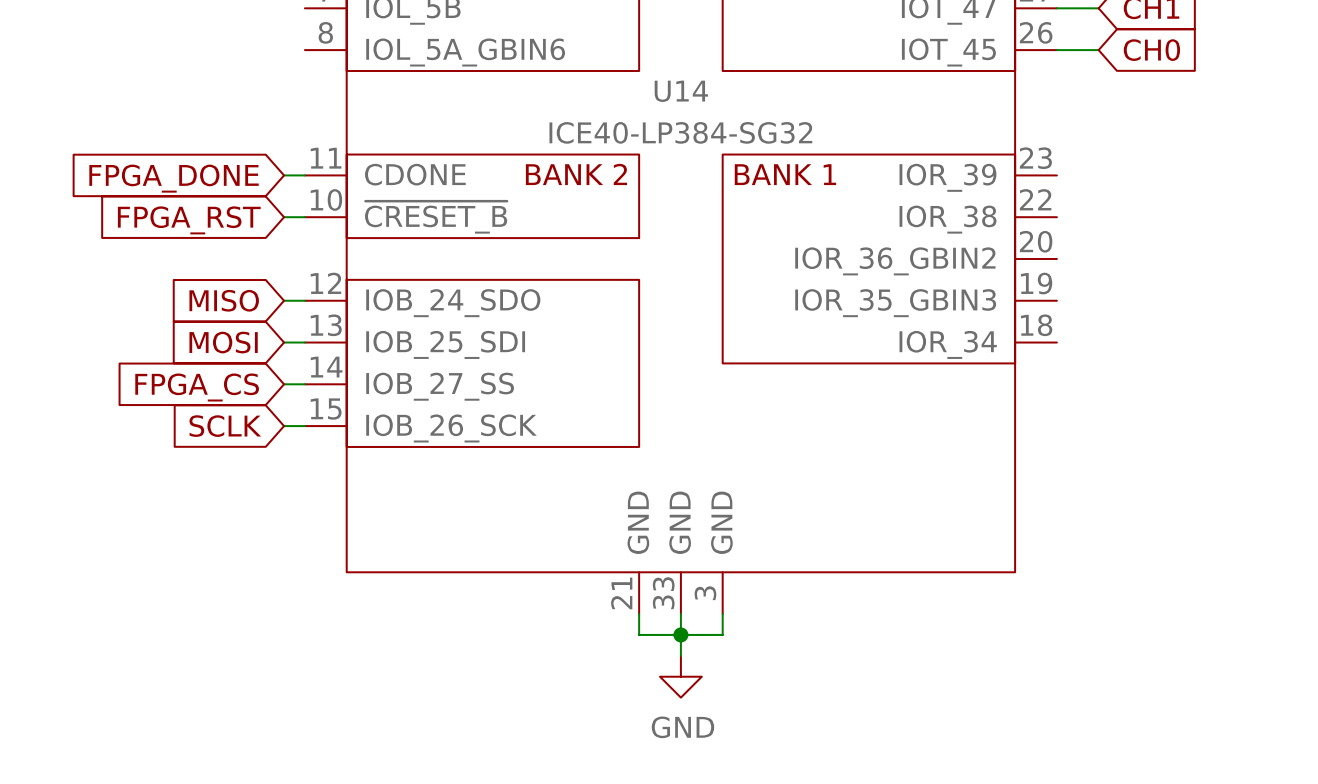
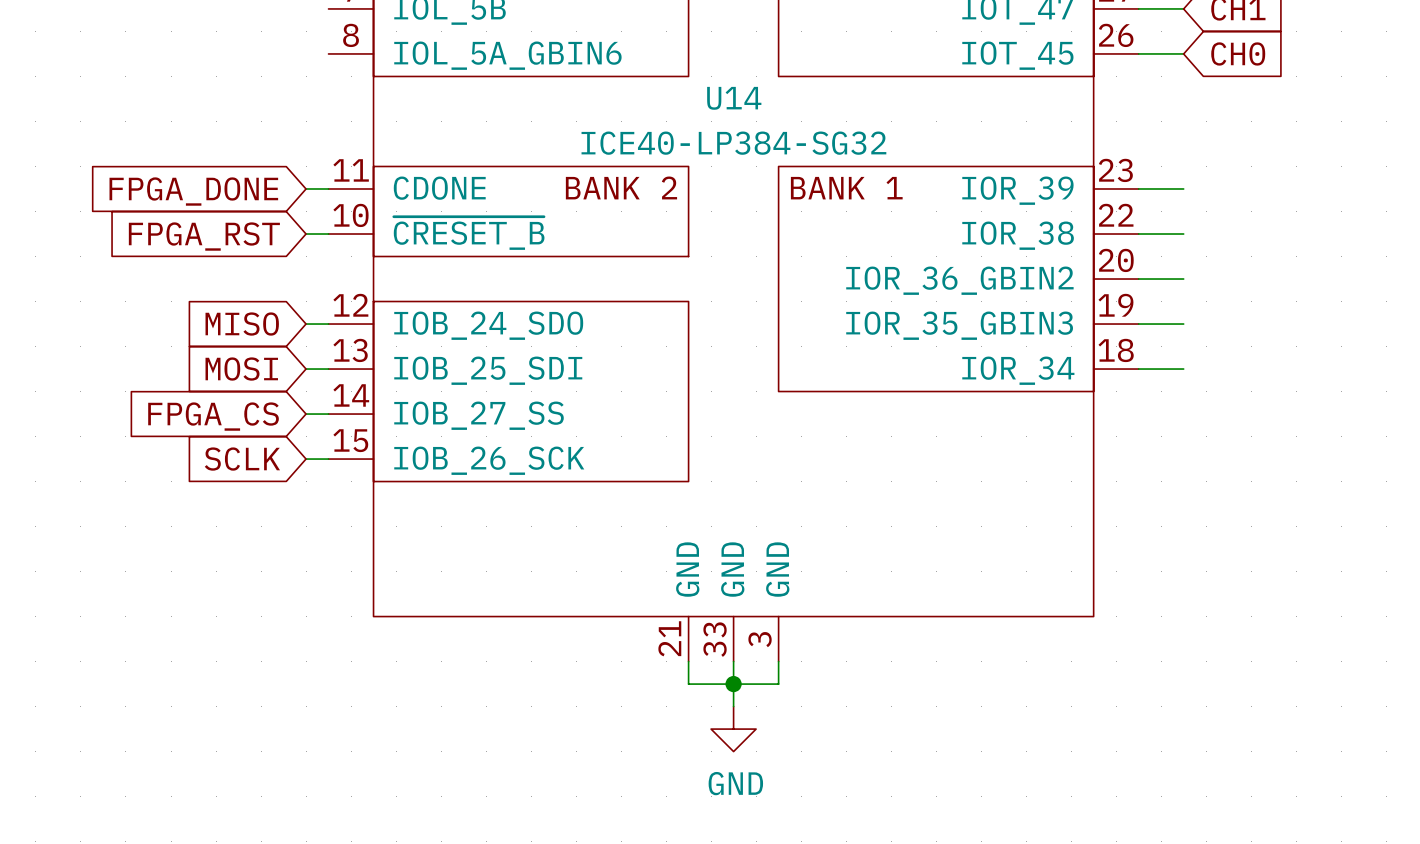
wire: none -> (1138, 188) (1183, 188)
wire: none -> (1138, 234) (1183, 234)
wire: none -> (1138, 279) (1183, 279)
wire: none -> (1138, 324) (1183, 324)
wire: none -> (1138, 369) (1183, 369)

